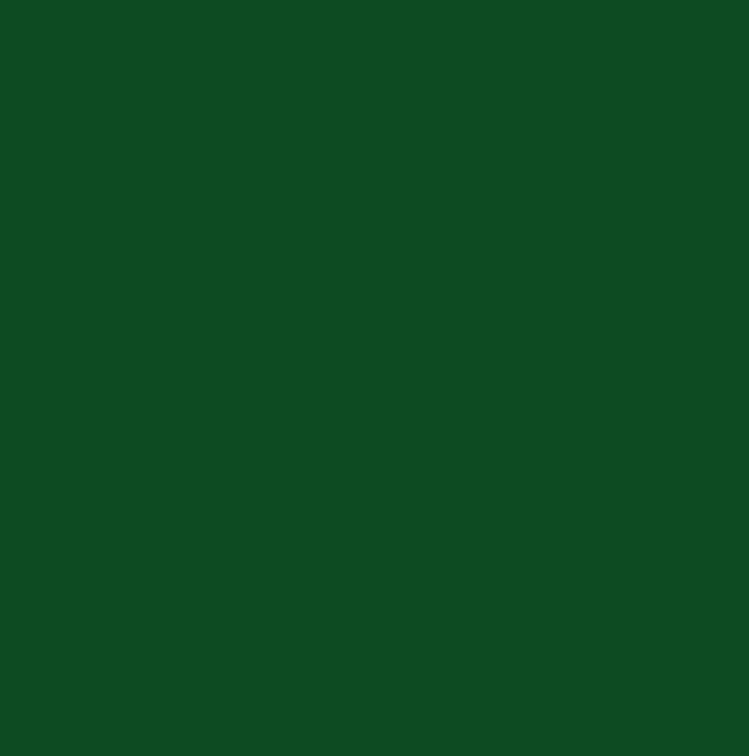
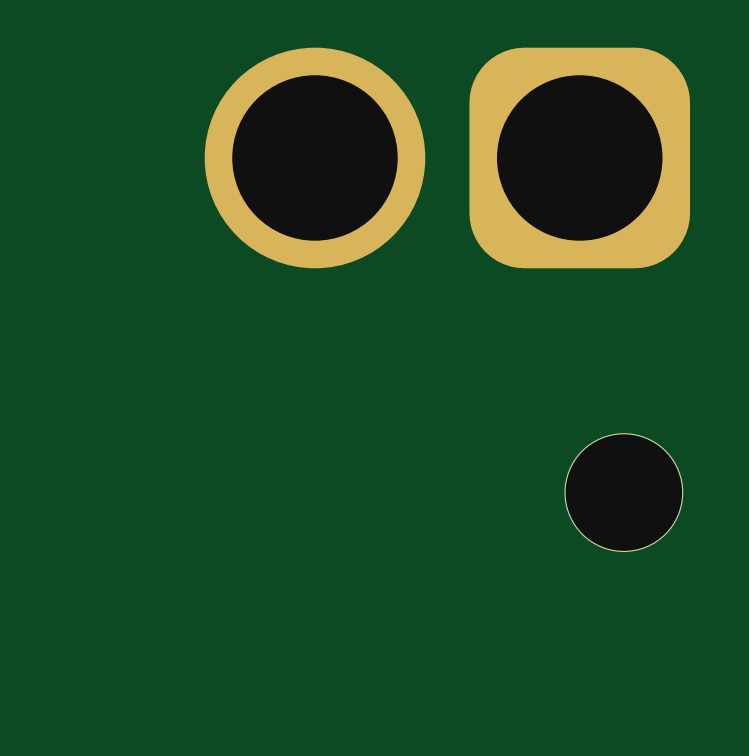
part: none -> (447, 157)
part: none -> (623, 492)

